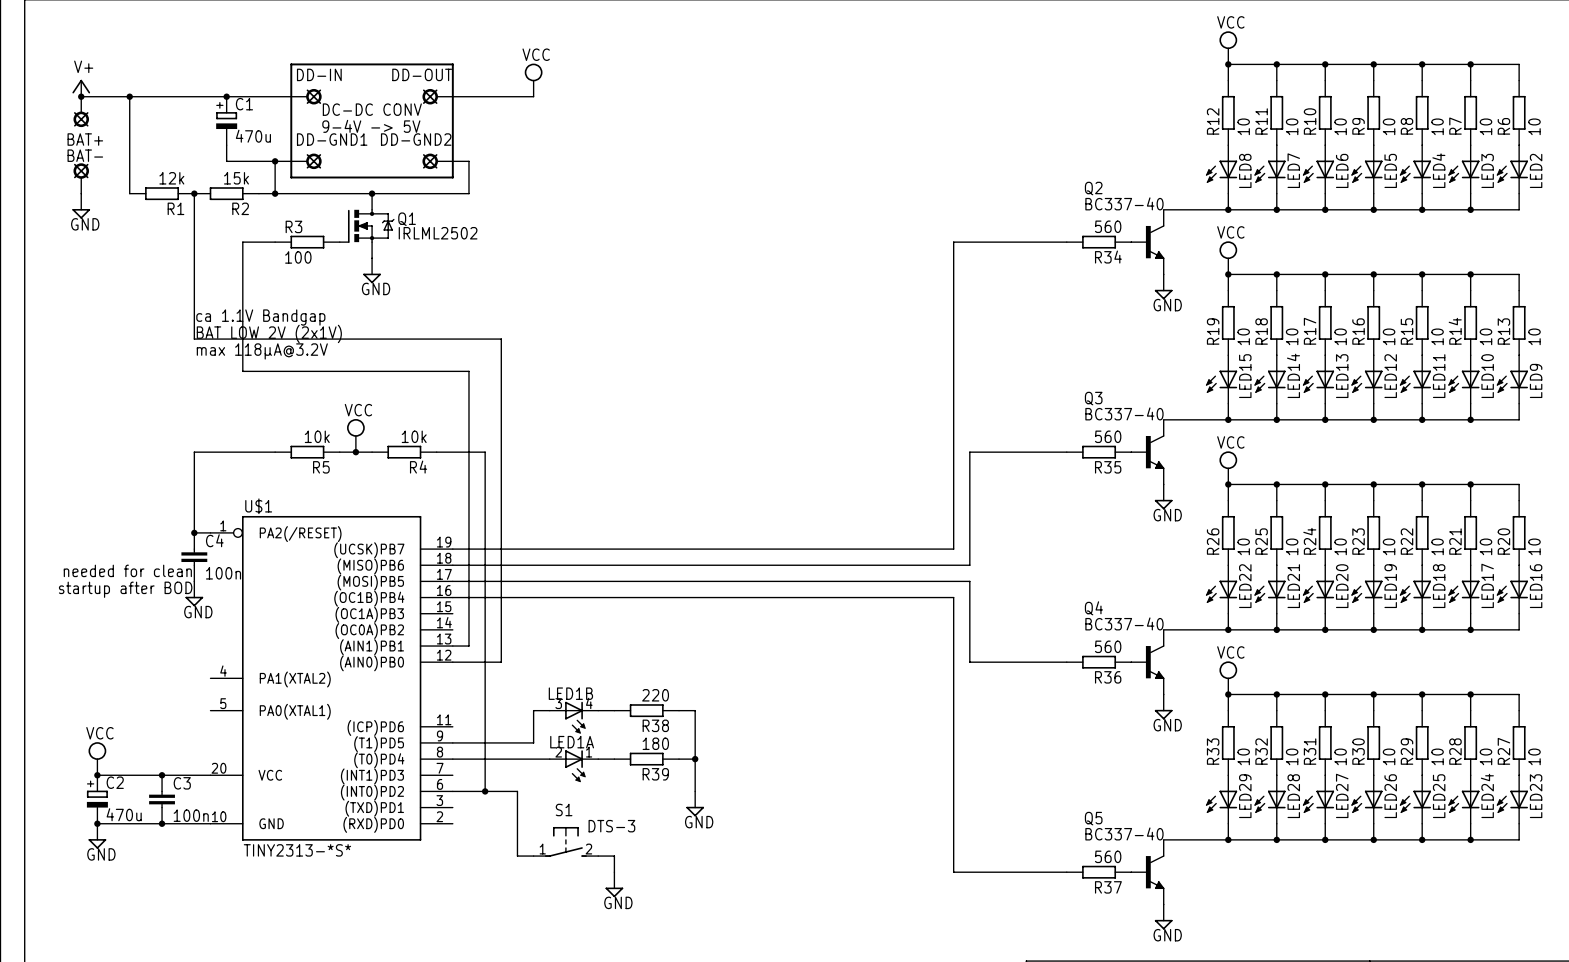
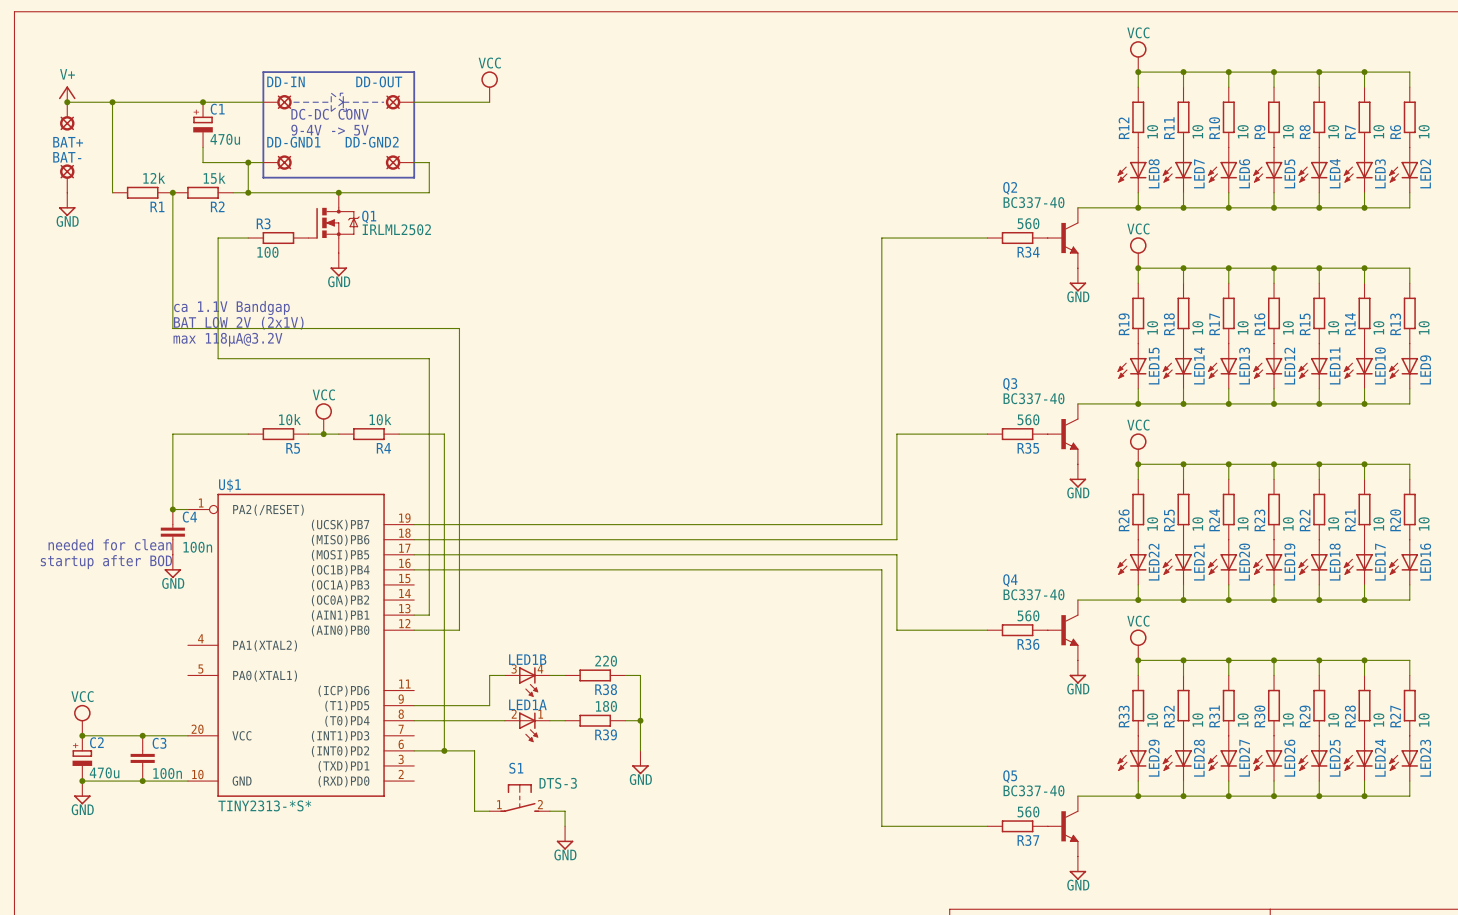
line: none -> (340, 96) (340, 93) (343, 93) (343, 111) (346, 111) (346, 108)
line: none -> (293, 102) (331, 102)
line: none -> (343, 102) (384, 102)
line: none -> (343, 102) (331, 93) (331, 111) (343, 102)

